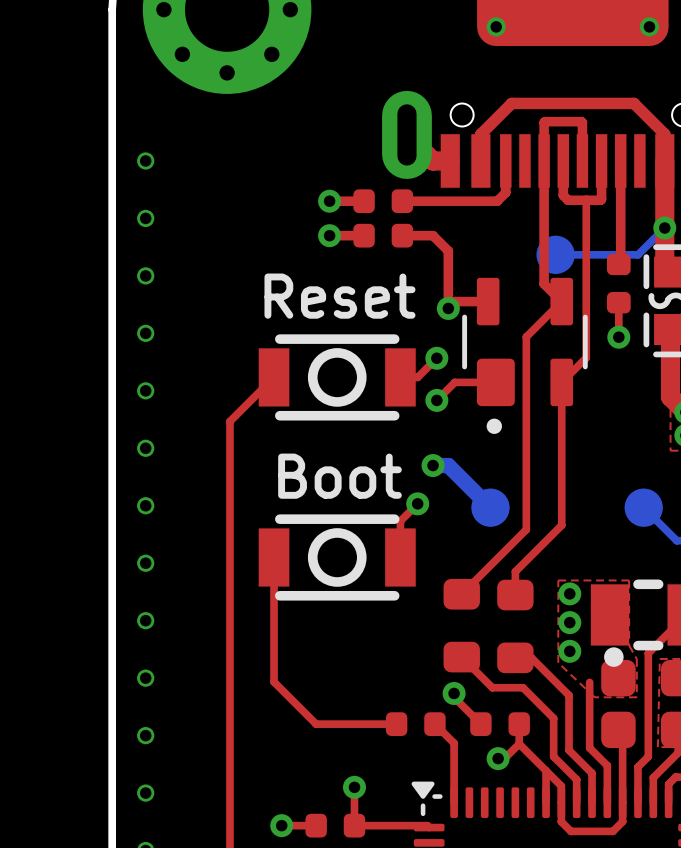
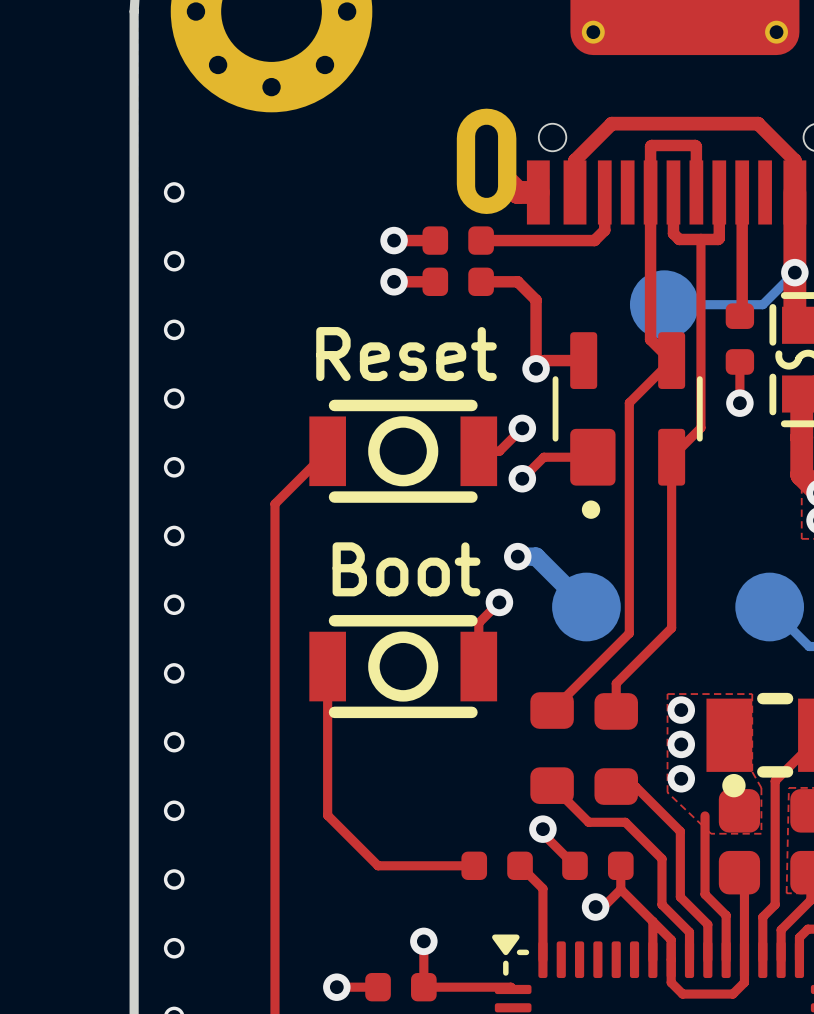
part footprint: [536, 235, 575, 274] -> [629, 270, 699, 340]
part footprint: [471, 488, 510, 527] -> [552, 572, 621, 642]
part footprint: [624, 488, 663, 527] -> [735, 572, 805, 642]

